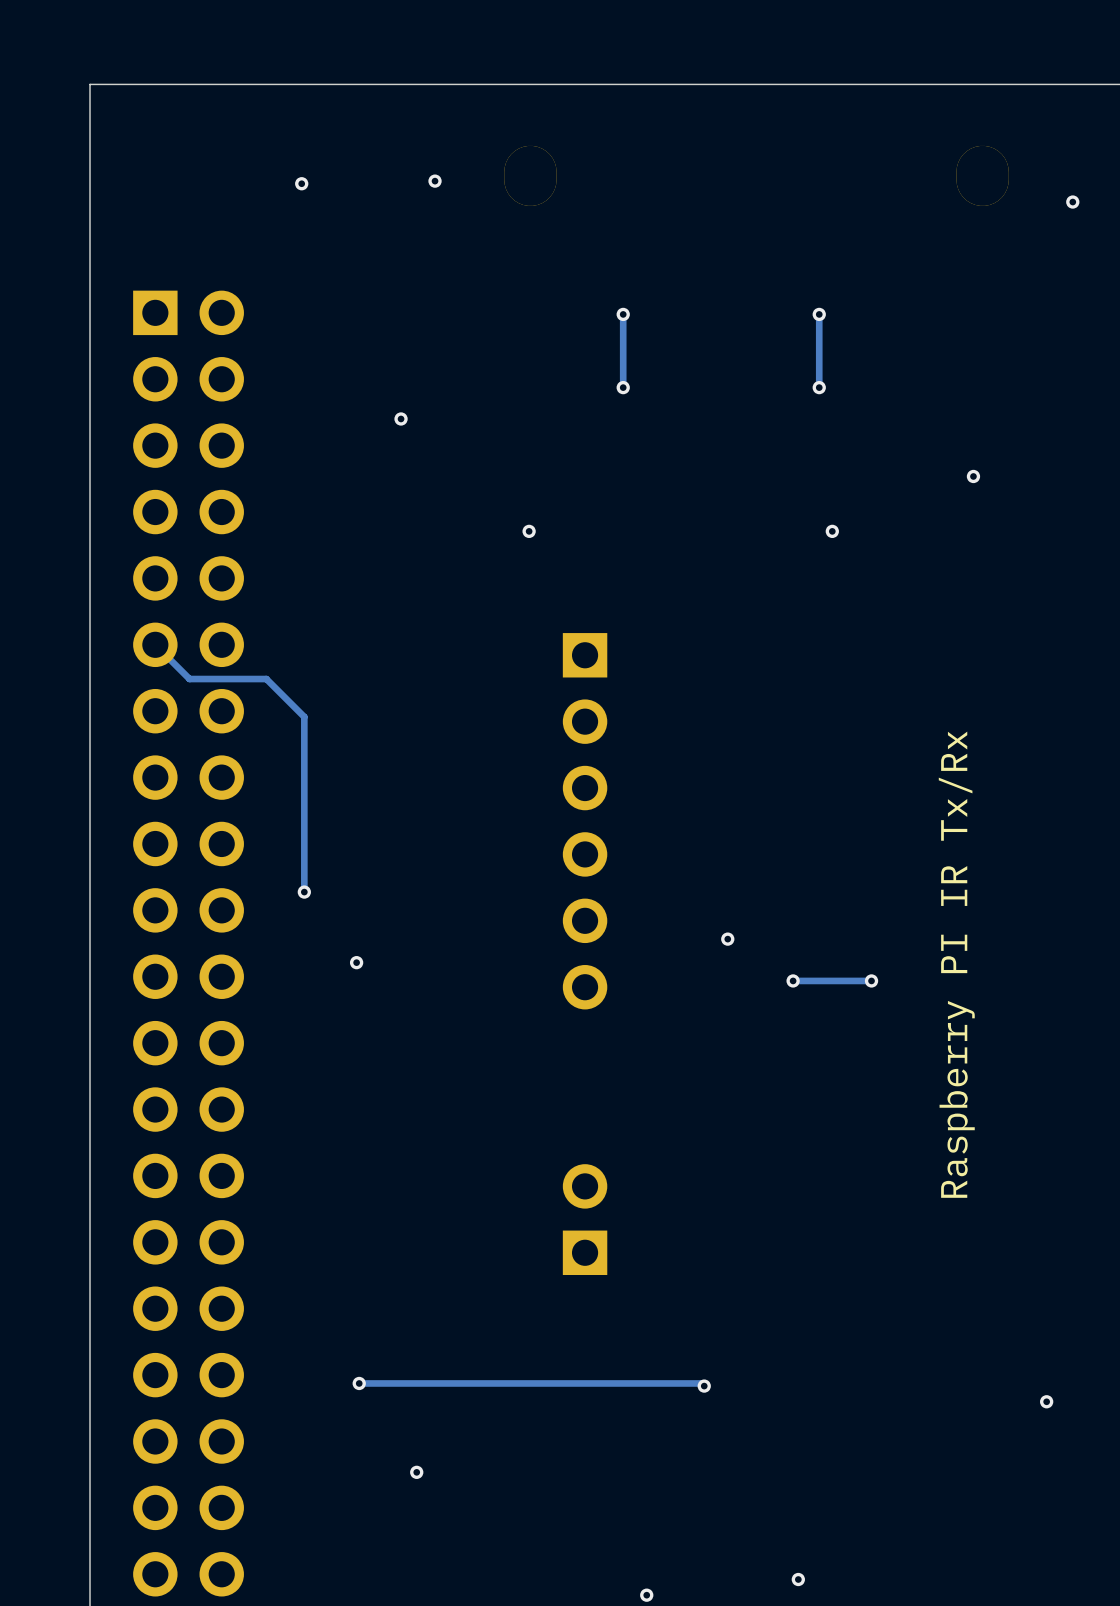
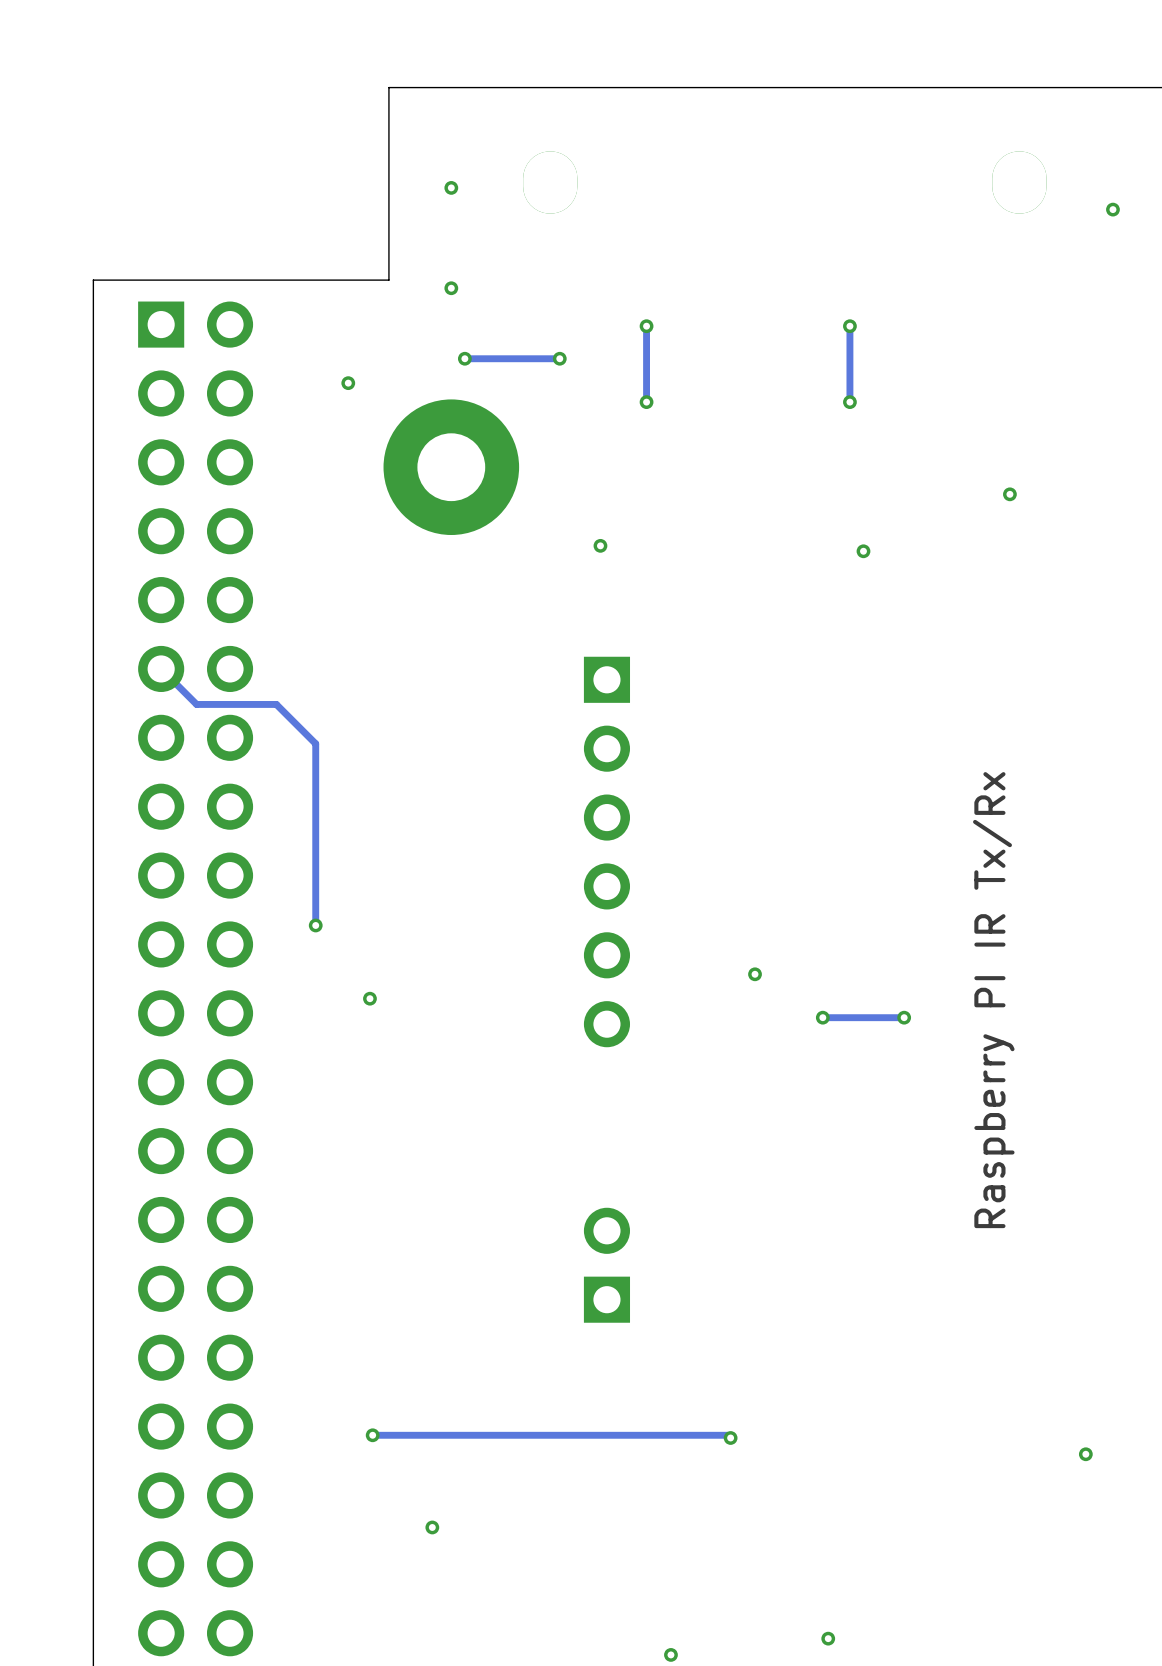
board edge: (374, 84) (90, 84) (90, 269) -> (388, 87) (388, 280) (93, 280)
via: (301, 183) -> none
via: none -> (451, 288)
via: none -> (464, 358)
track: none -> (559, 358) (464, 358)
via: none -> (559, 358)
via: none -> (348, 383)
via: (401, 418) -> none
part: none -> (451, 467)
via position: (529, 531) -> (600, 545)

